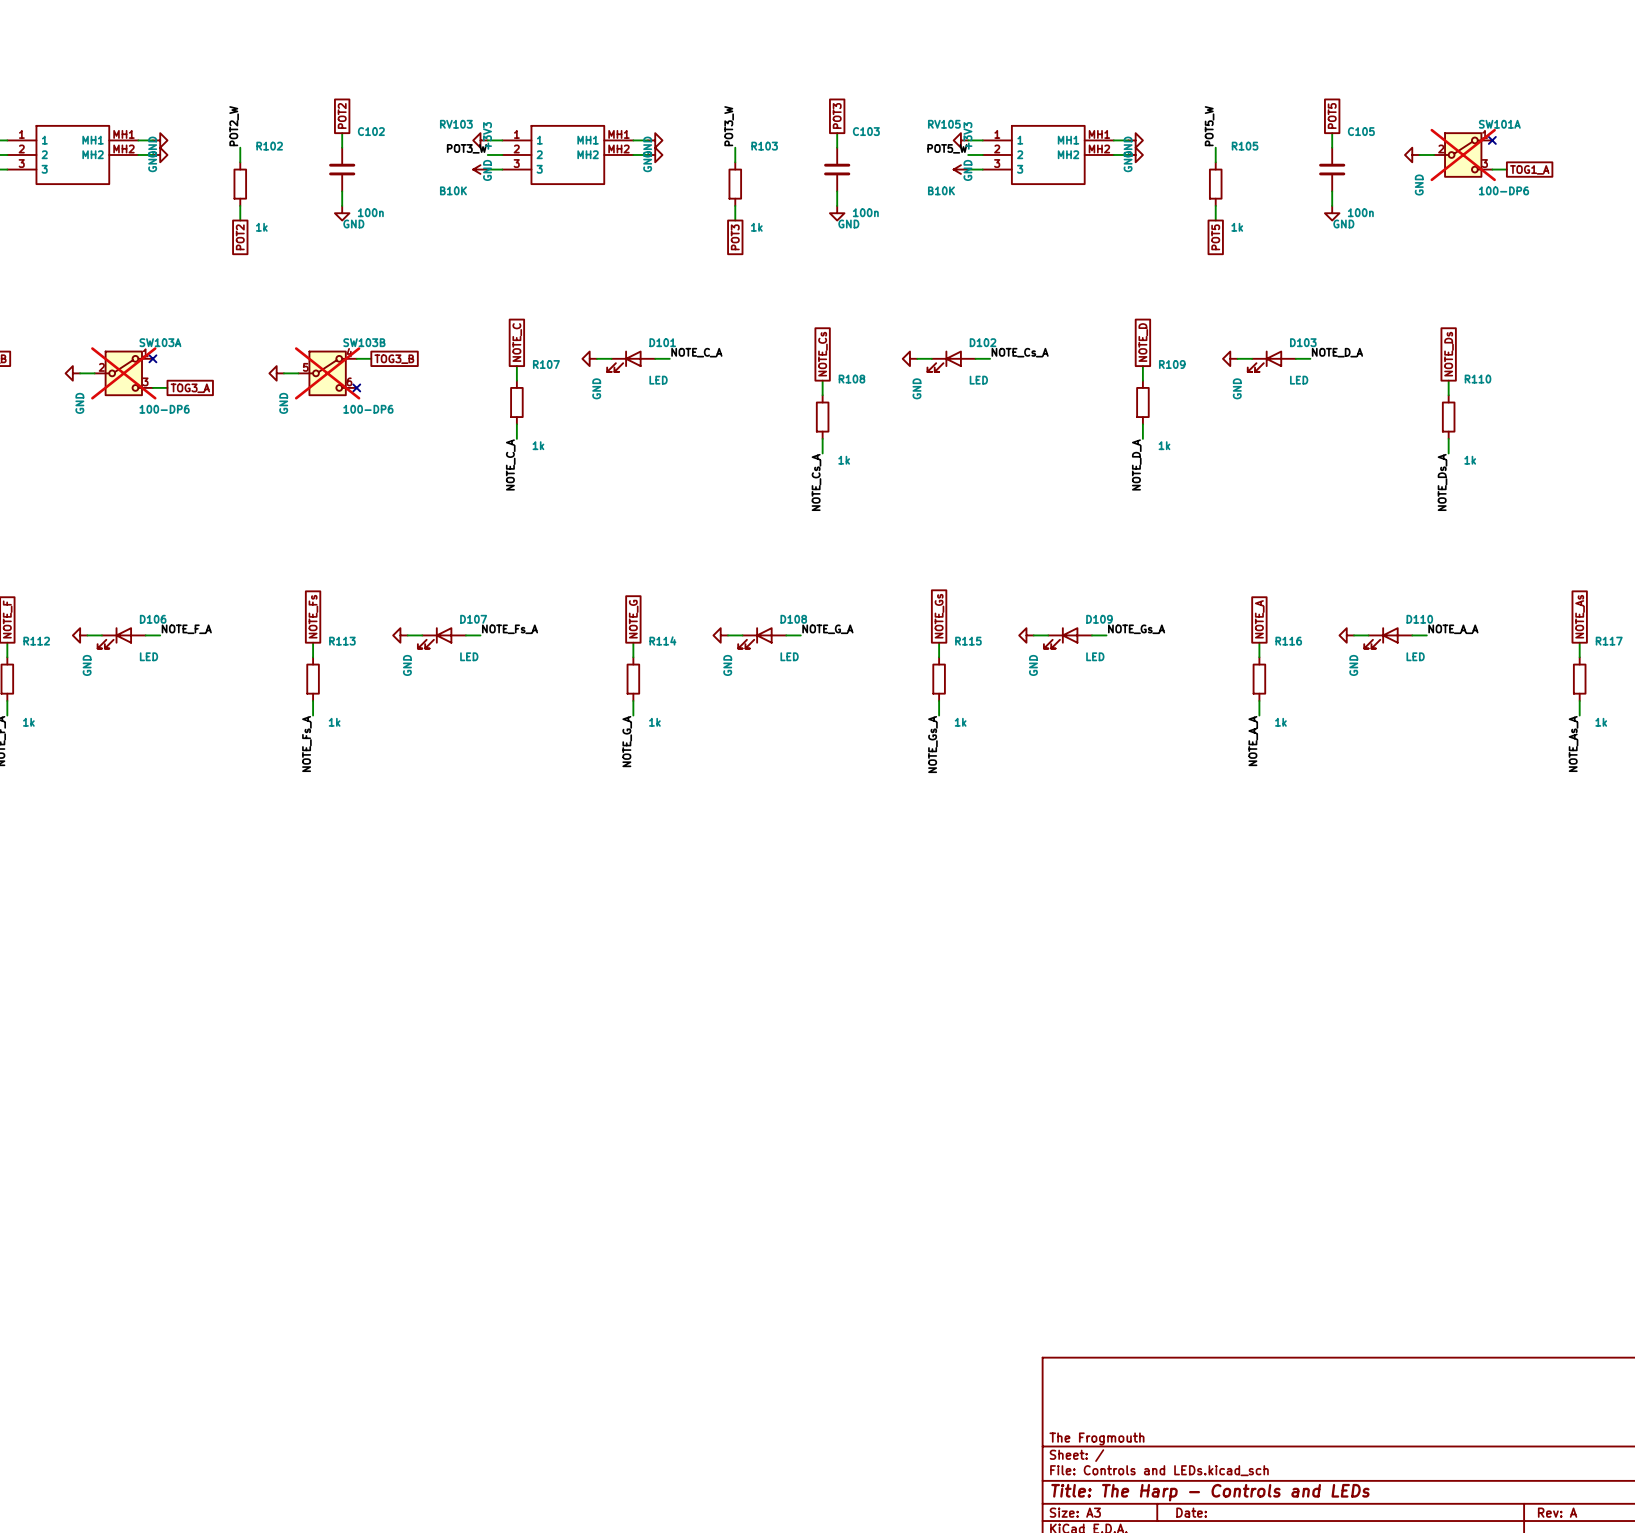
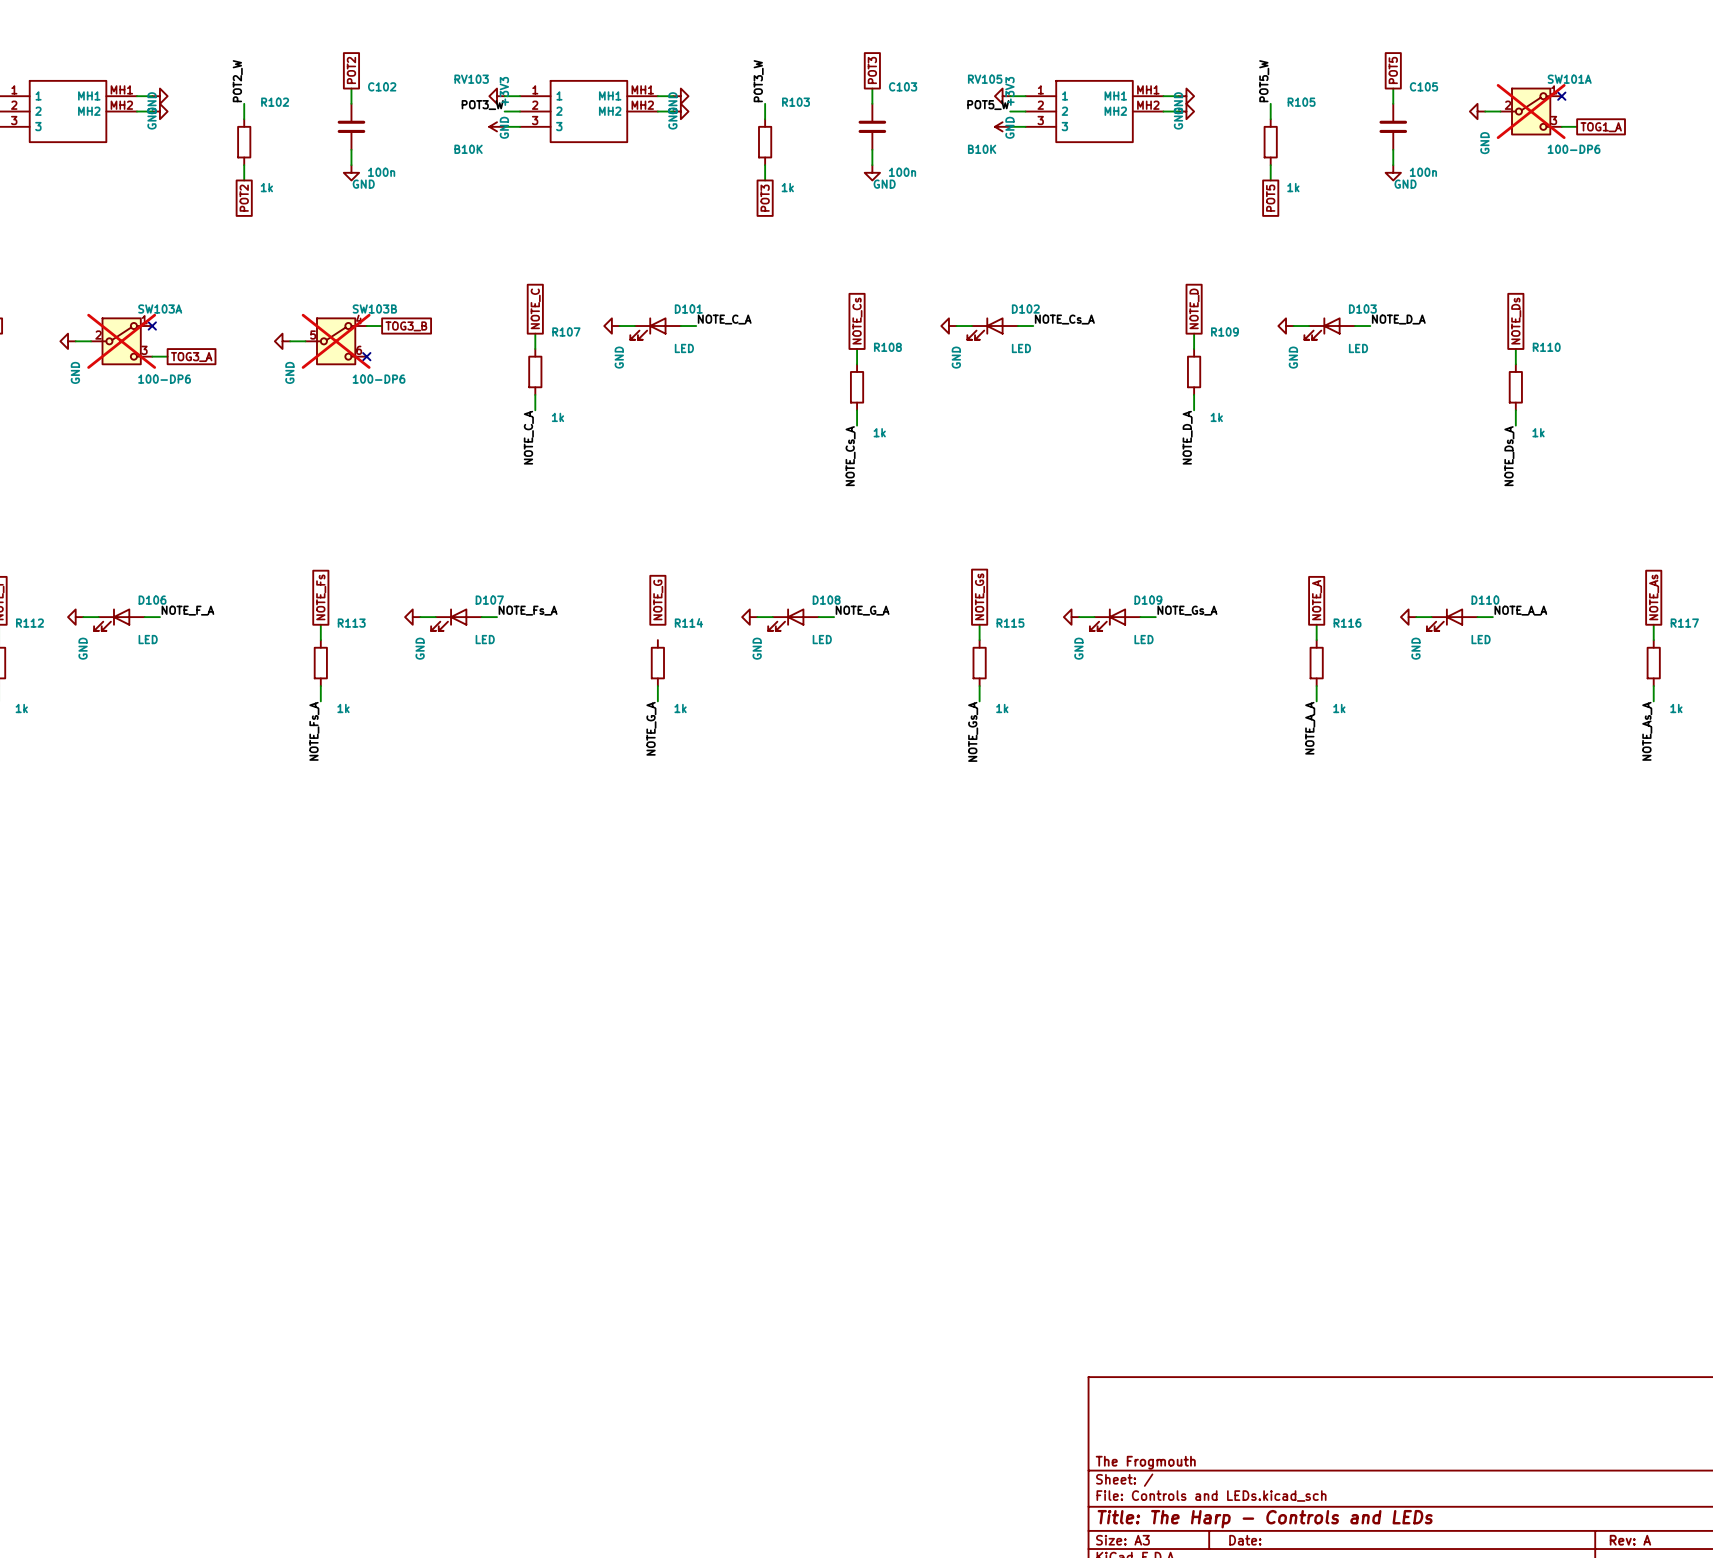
wire: (633, 642) (633, 657) -> none

